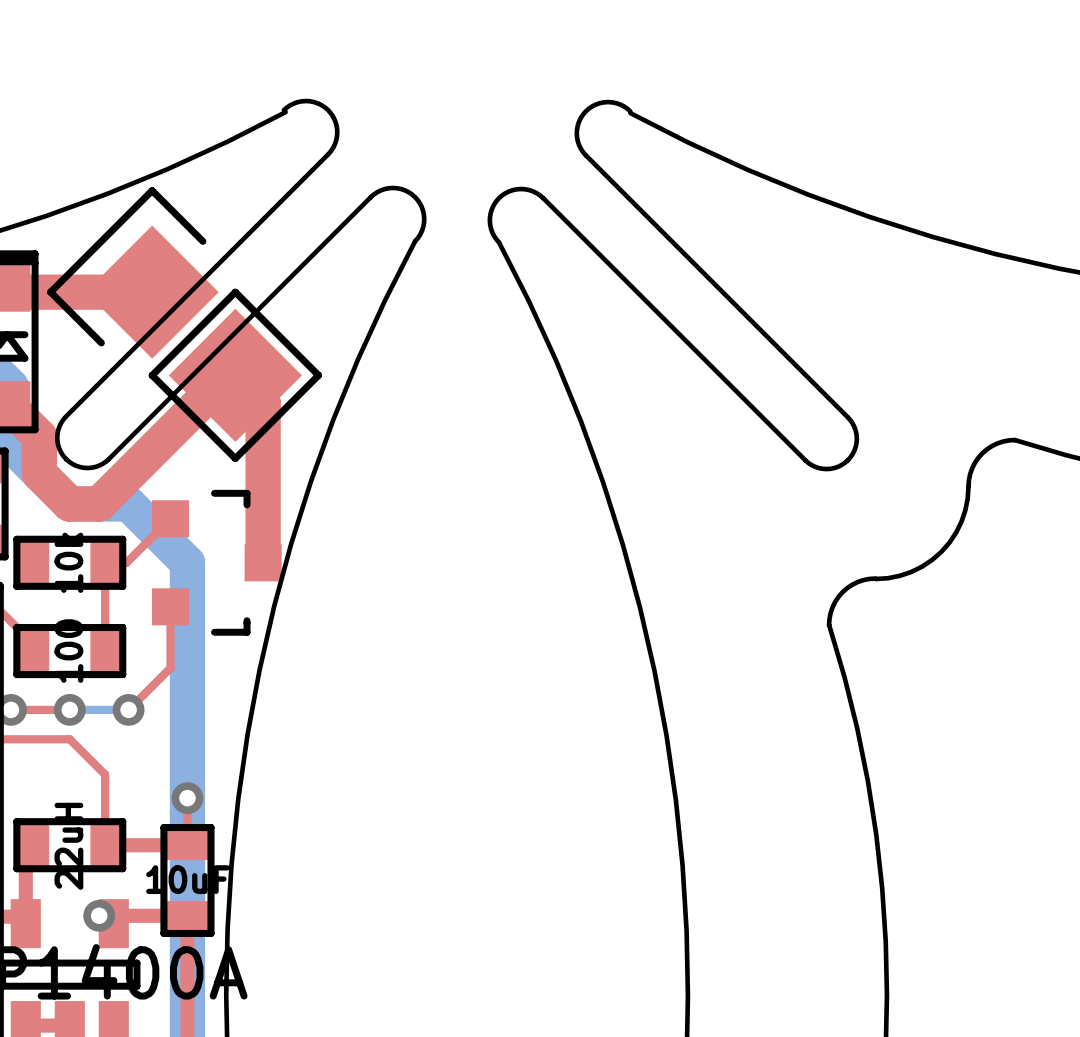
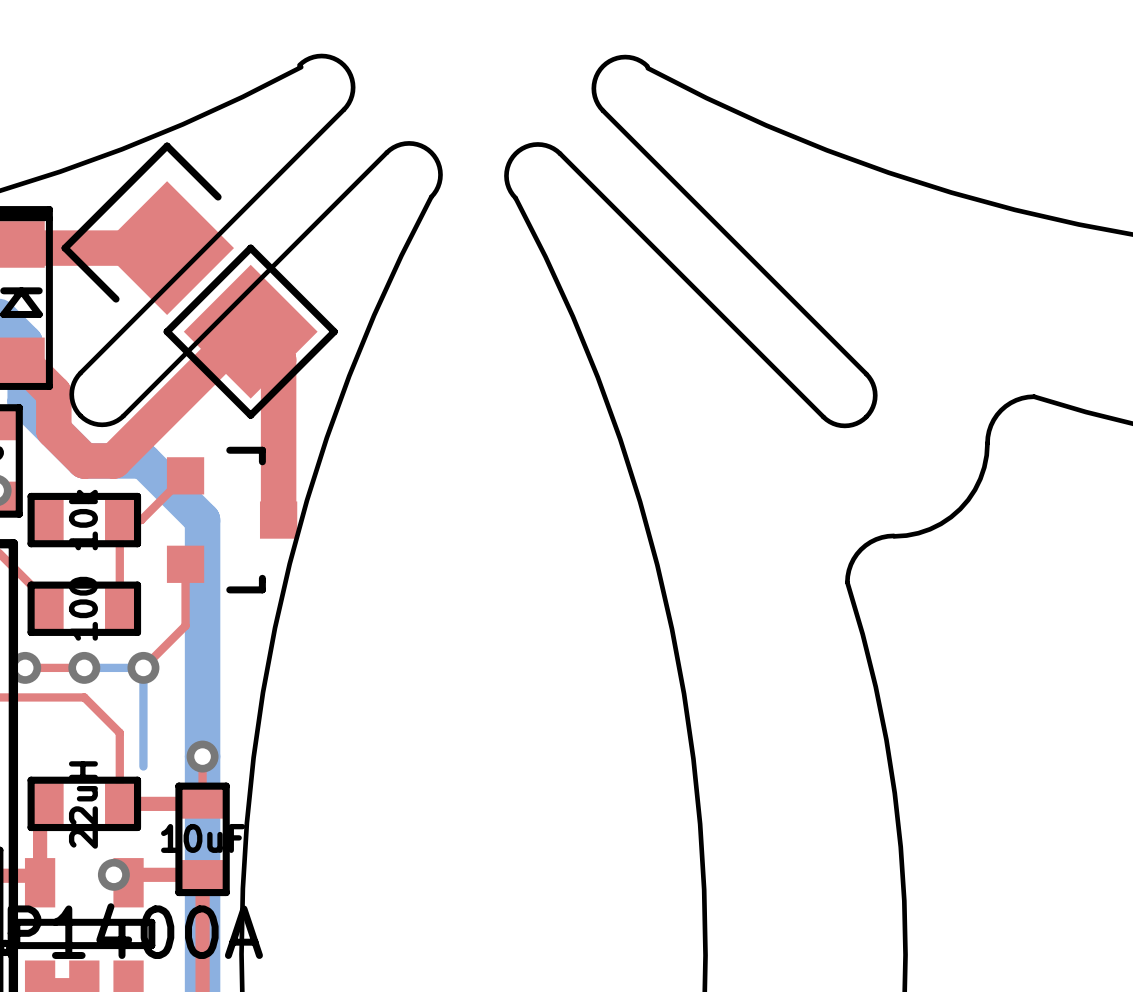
bottom track: none -> (143, 667) (143, 766)

